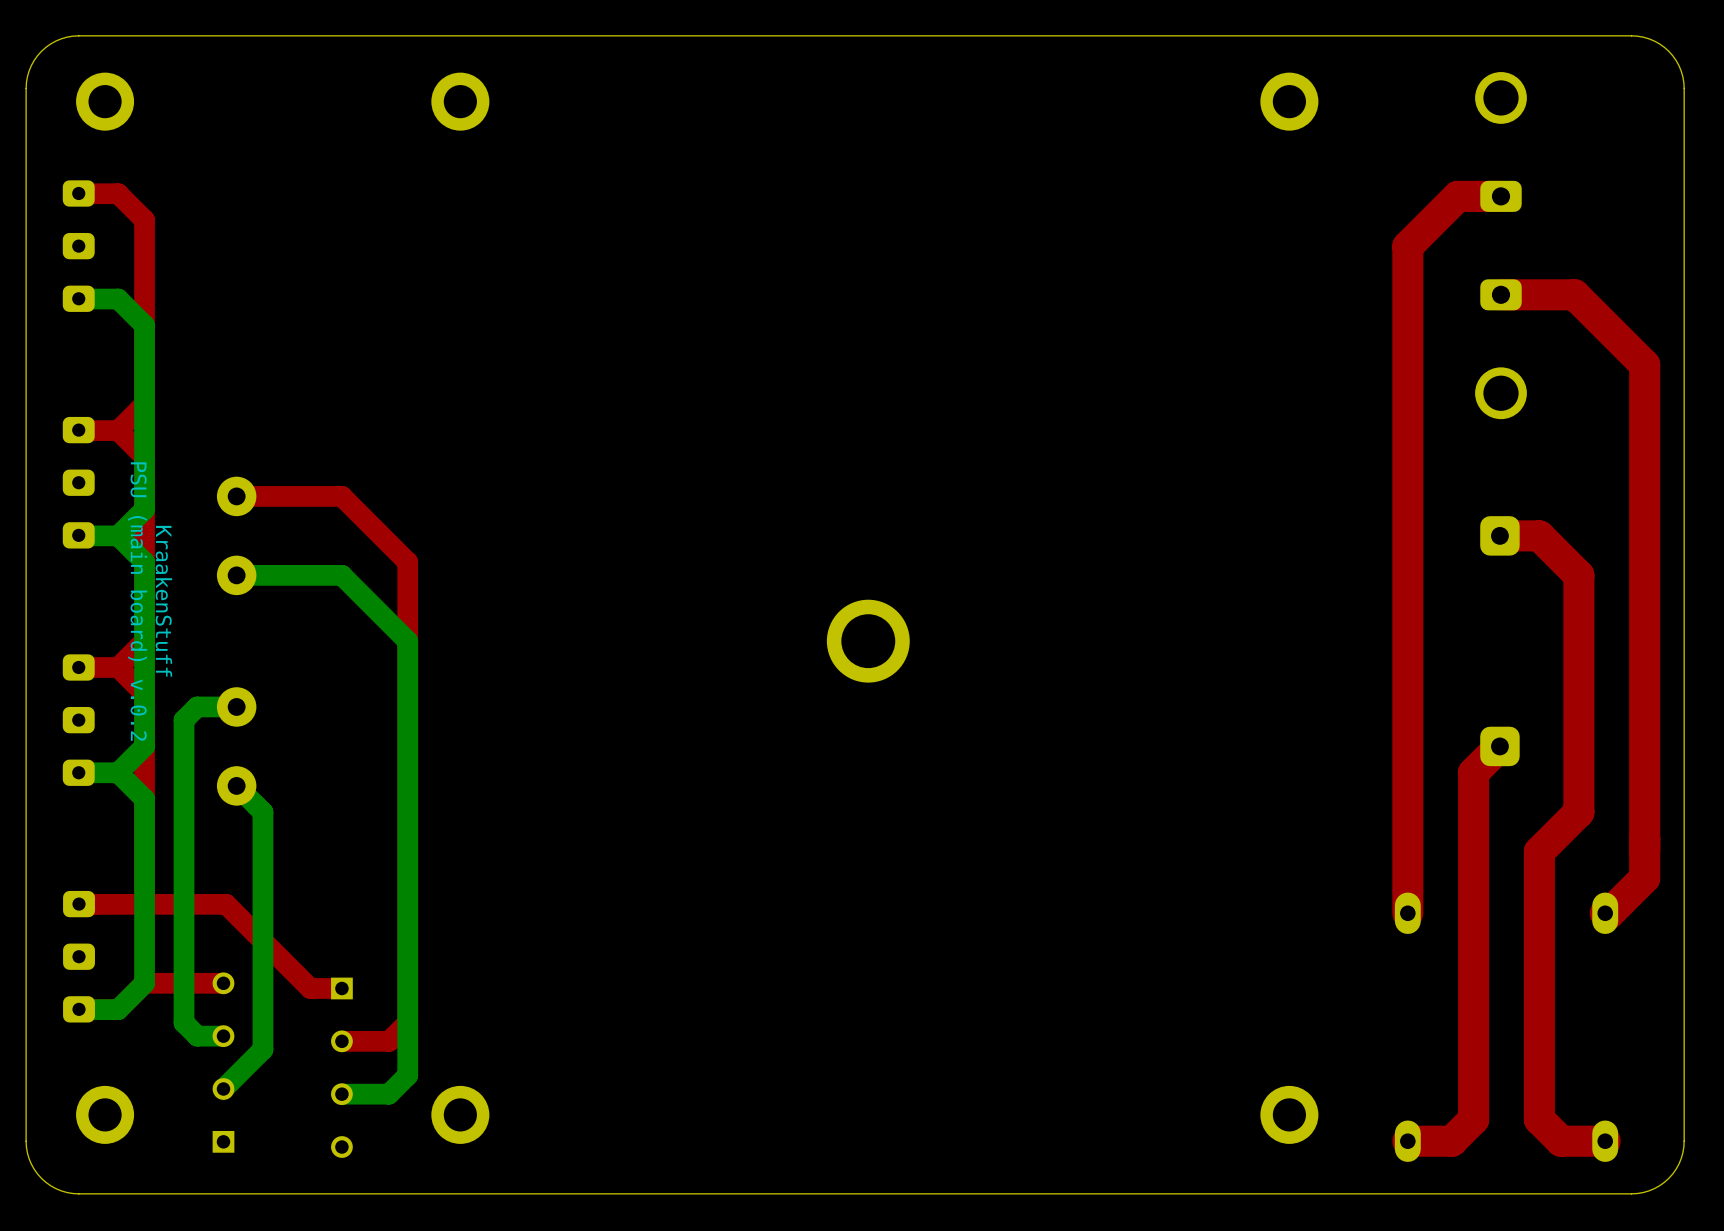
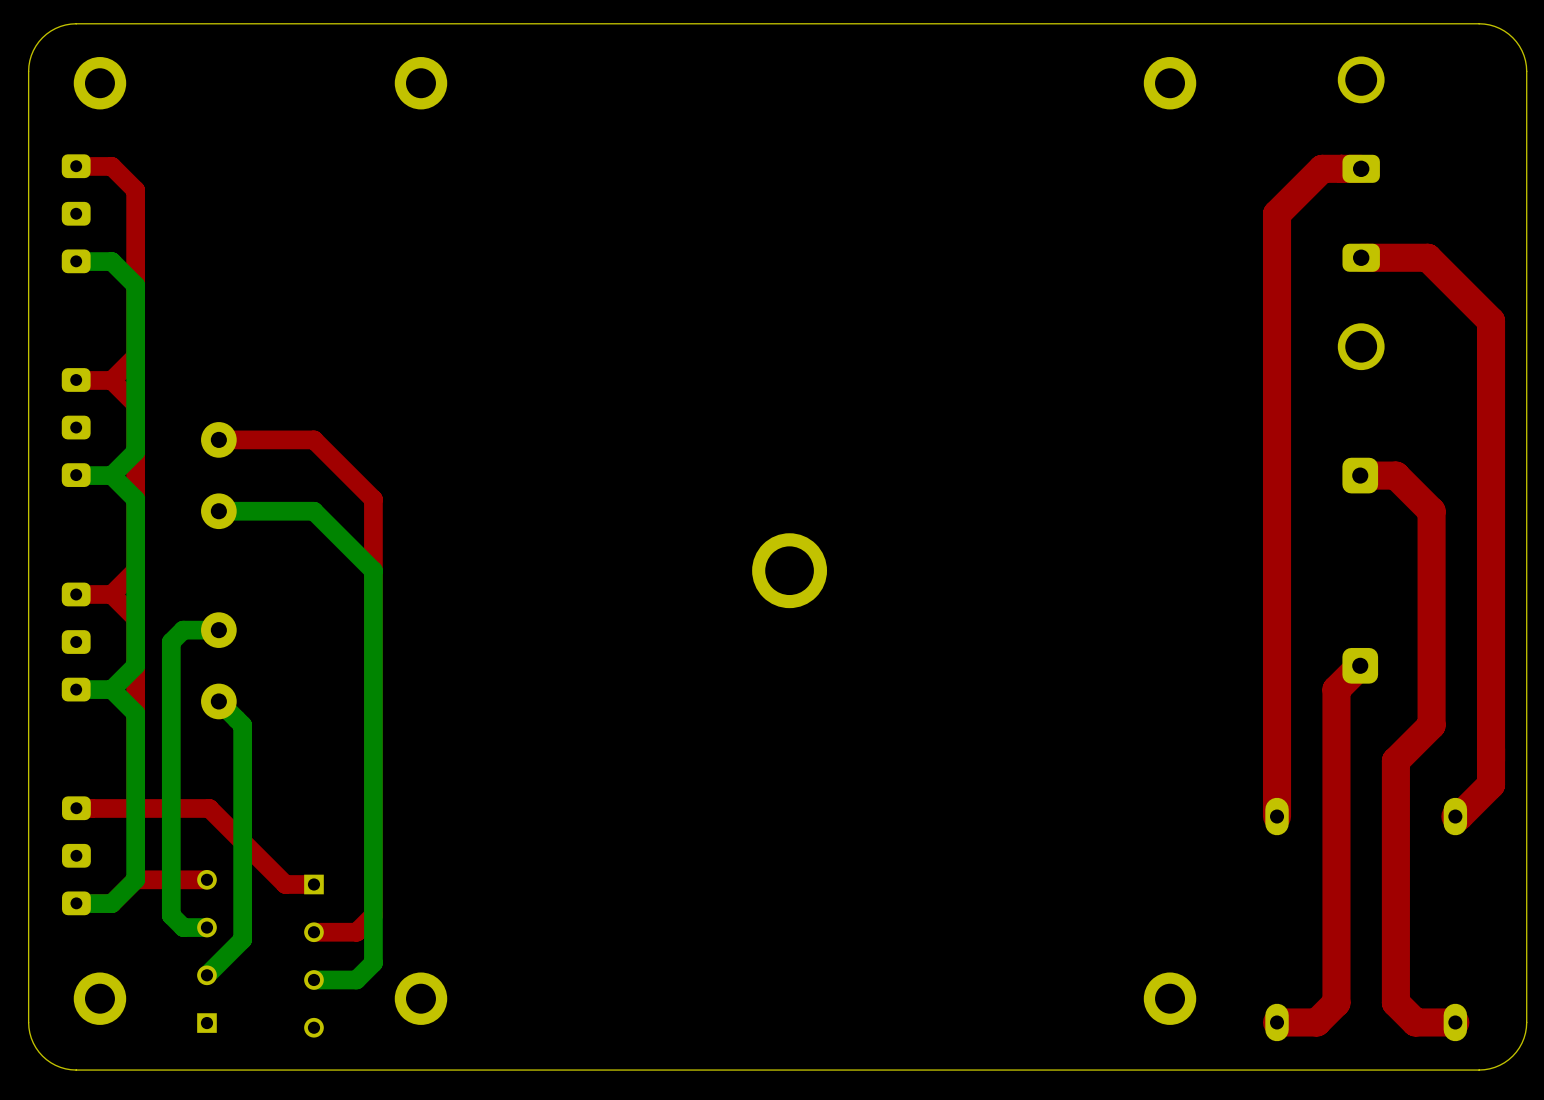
text: PSU (main board) v.0.2 (137, 601) -> none
text: KraakenStuff (163, 601) -> none

